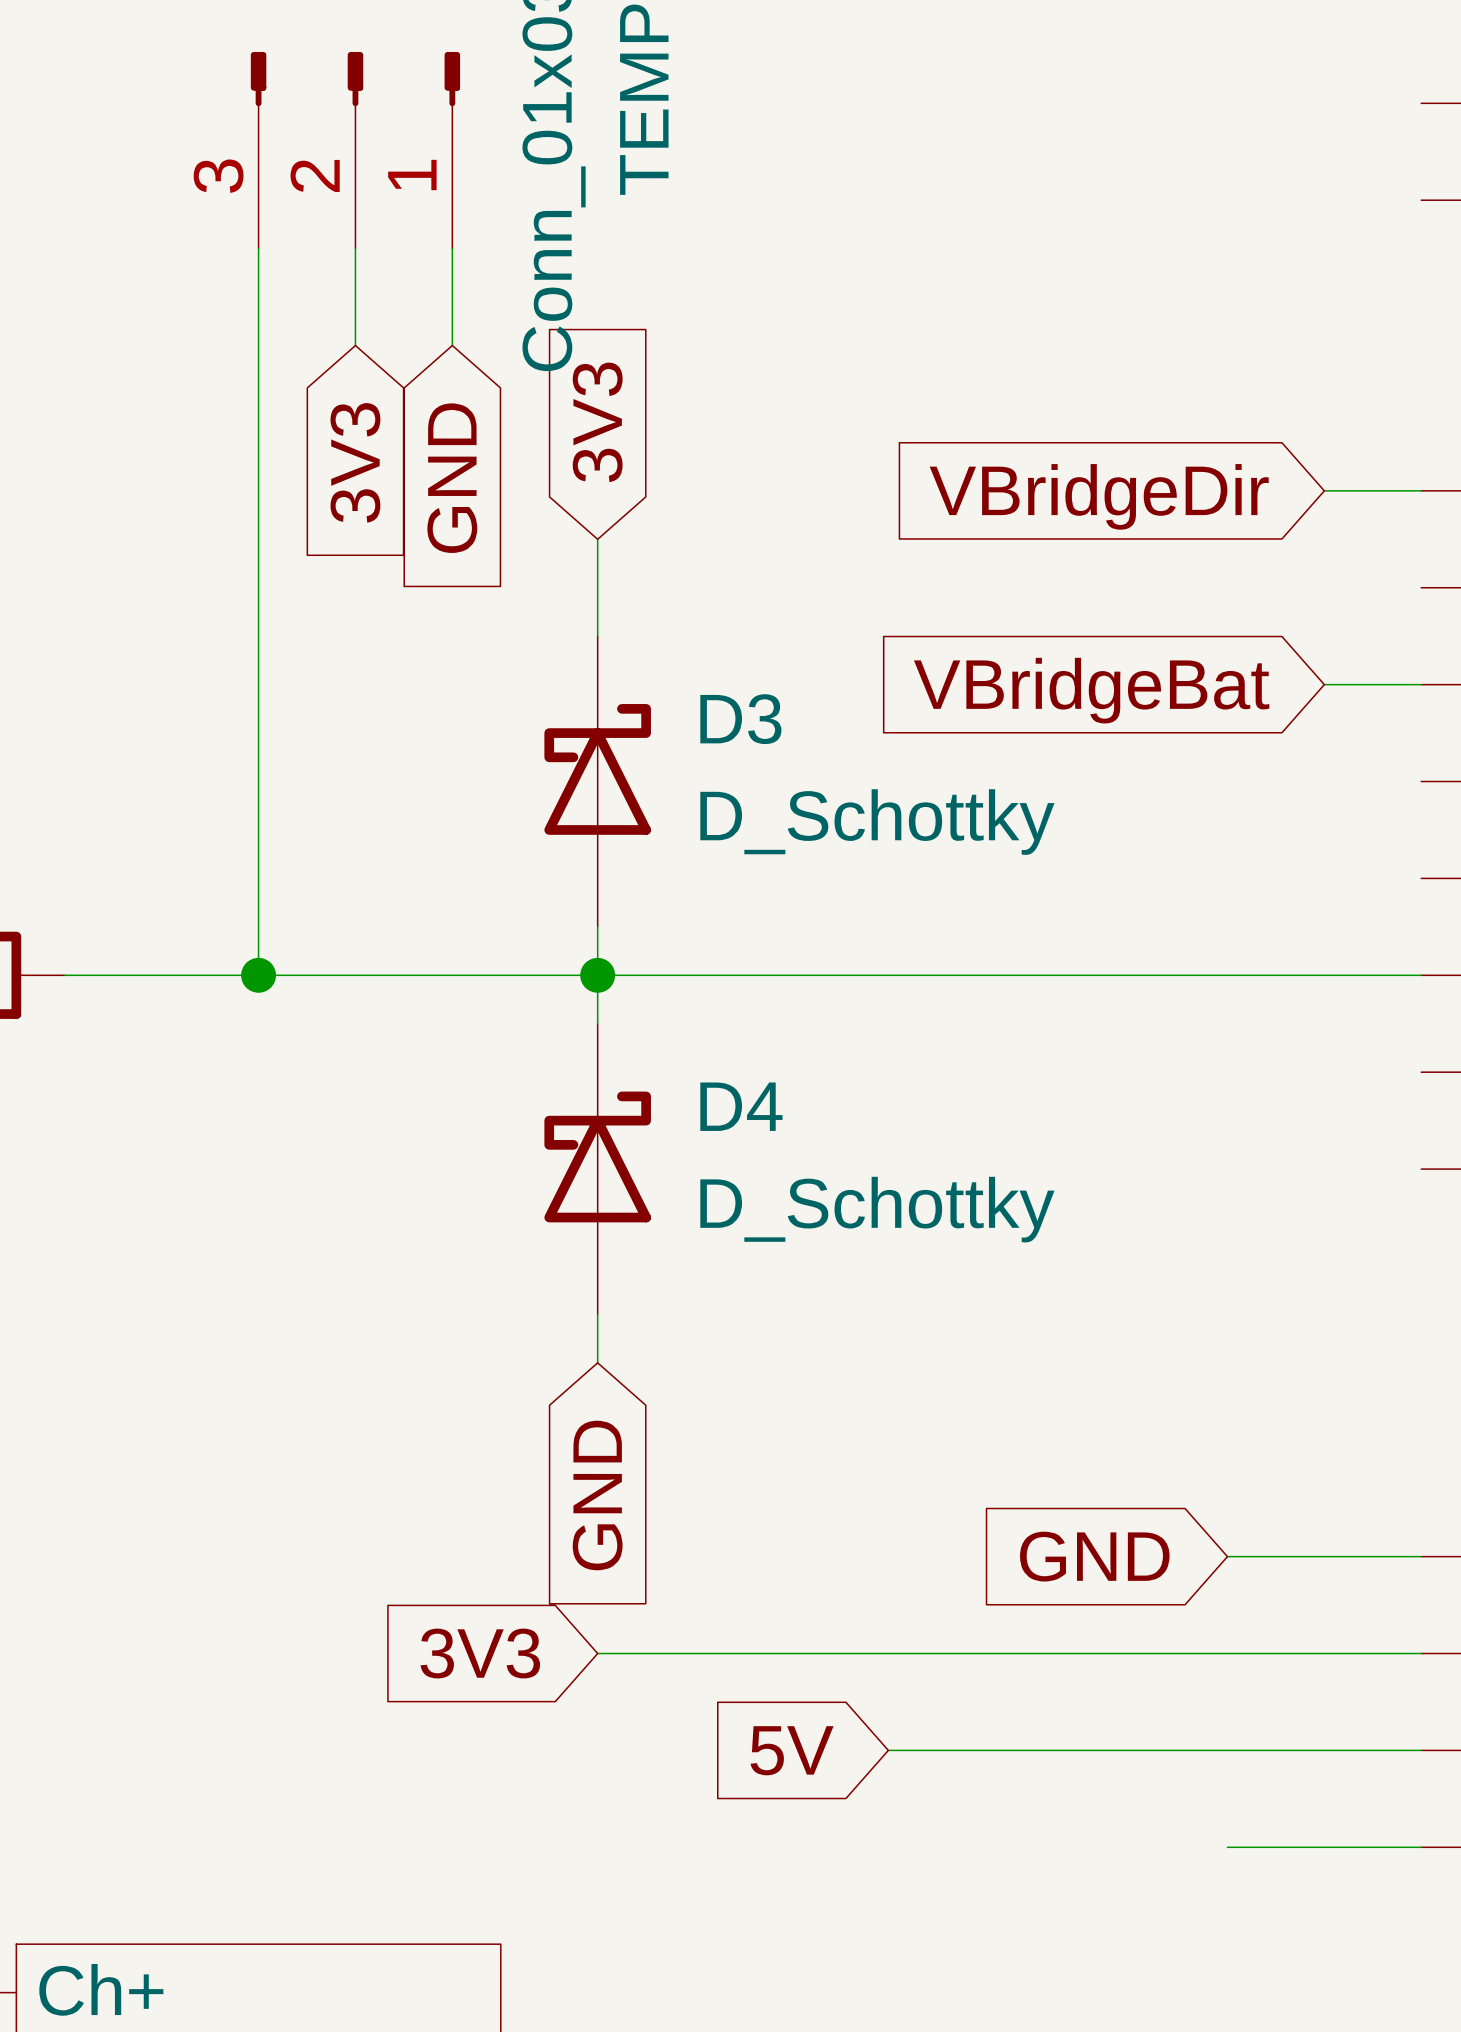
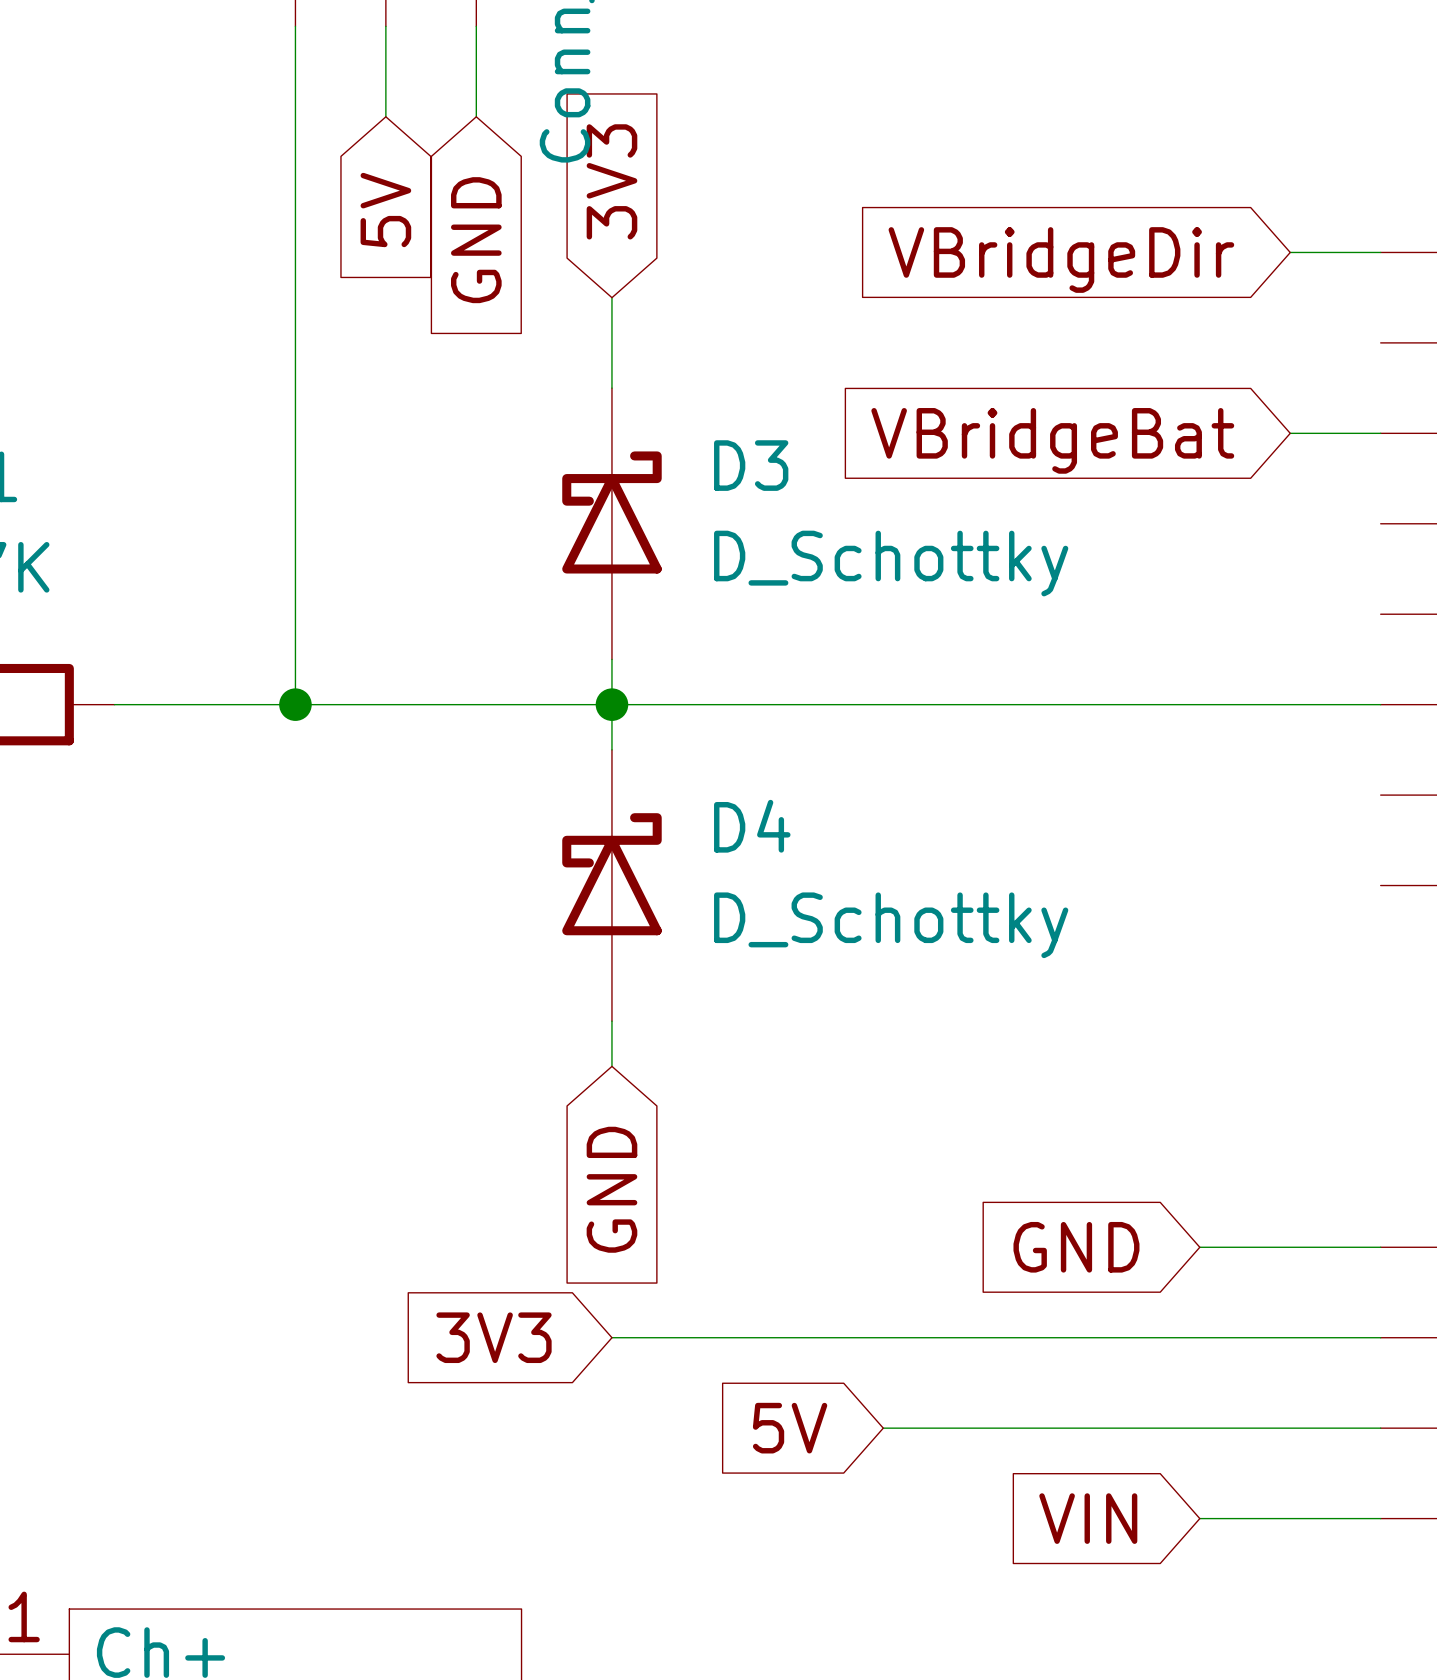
global label: 3V3 (355, 462) -> 5V (385, 210)
global label: none -> VIN (1088, 1518)

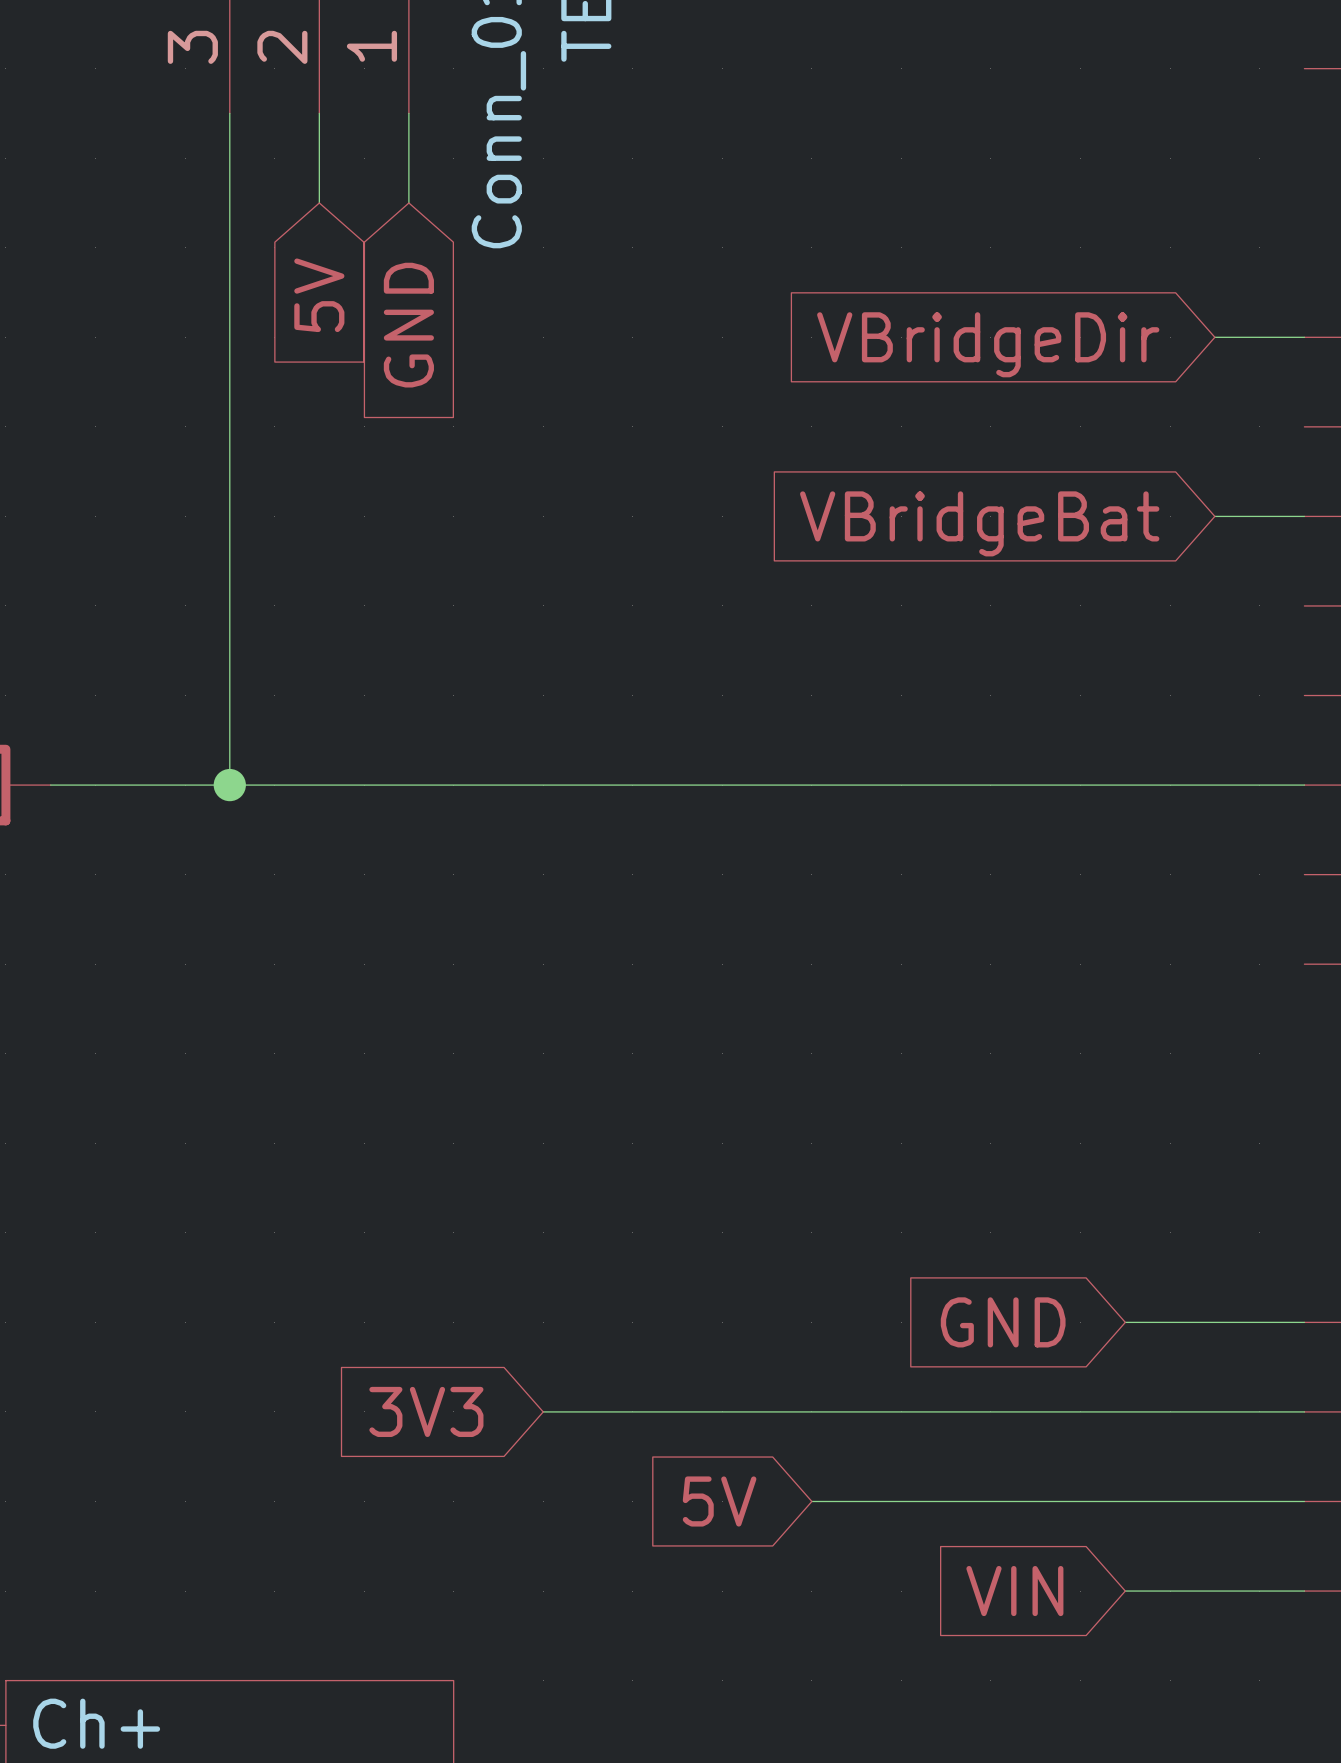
global label: 3V3 (611, 181) -> none
wire: (611, 297) (611, 388) -> none
D3: D_Schottky (611, 523) -> none
wire: (611, 659) (611, 749) -> none
junction: (611, 704) -> none
D4: D_Schottky (611, 885) -> none
wire: (611, 1021) (611, 1066) -> none
global label: GND (611, 1189) -> none

